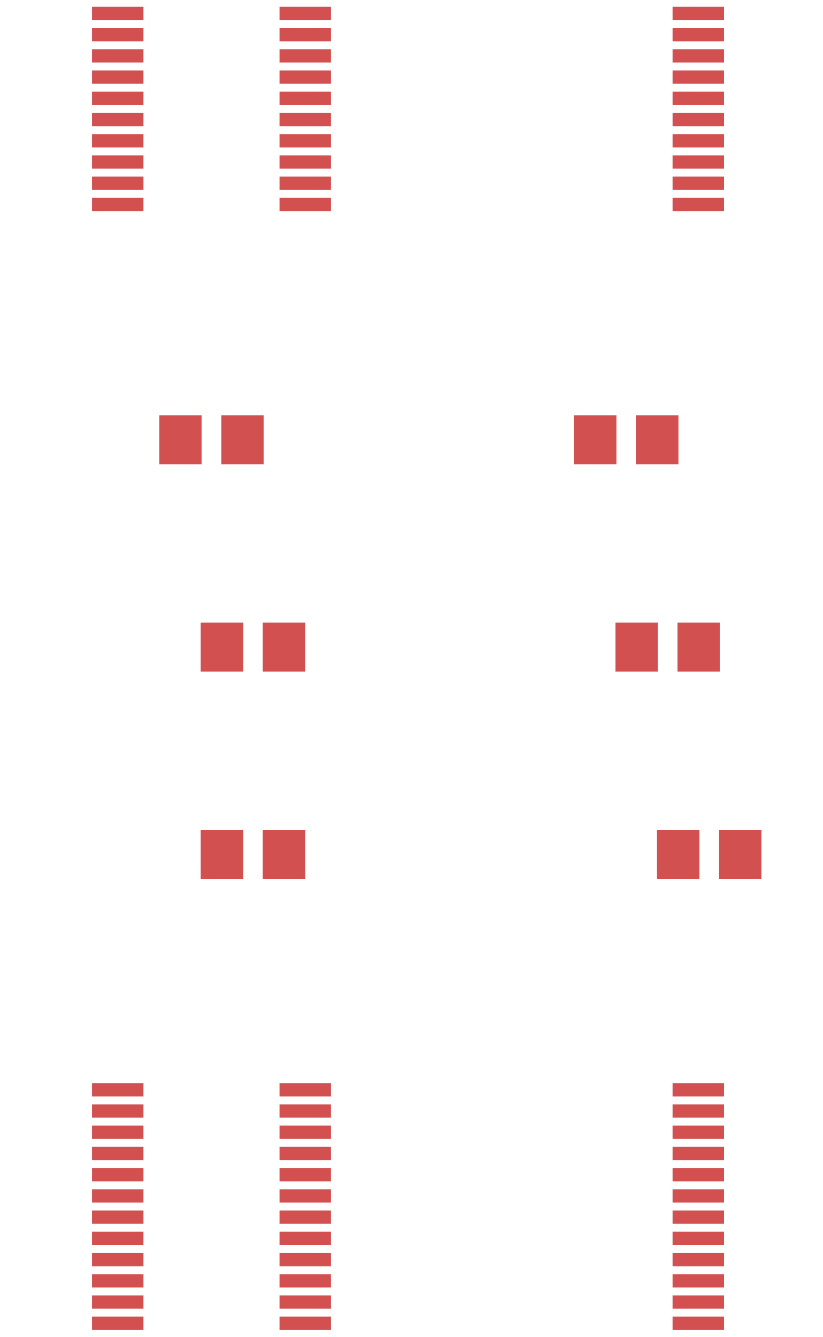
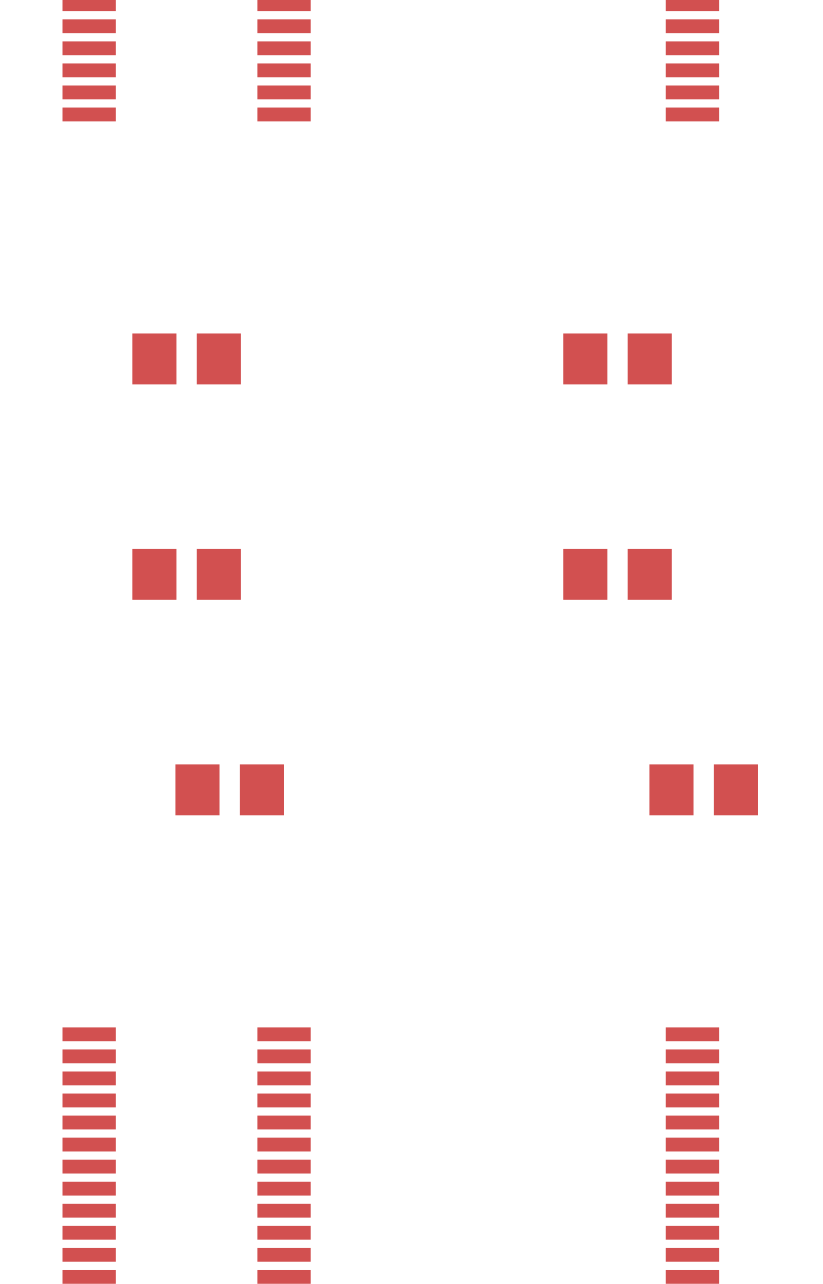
part position: (252, 647) -> (186, 574)
part position: (667, 647) -> (617, 574)

